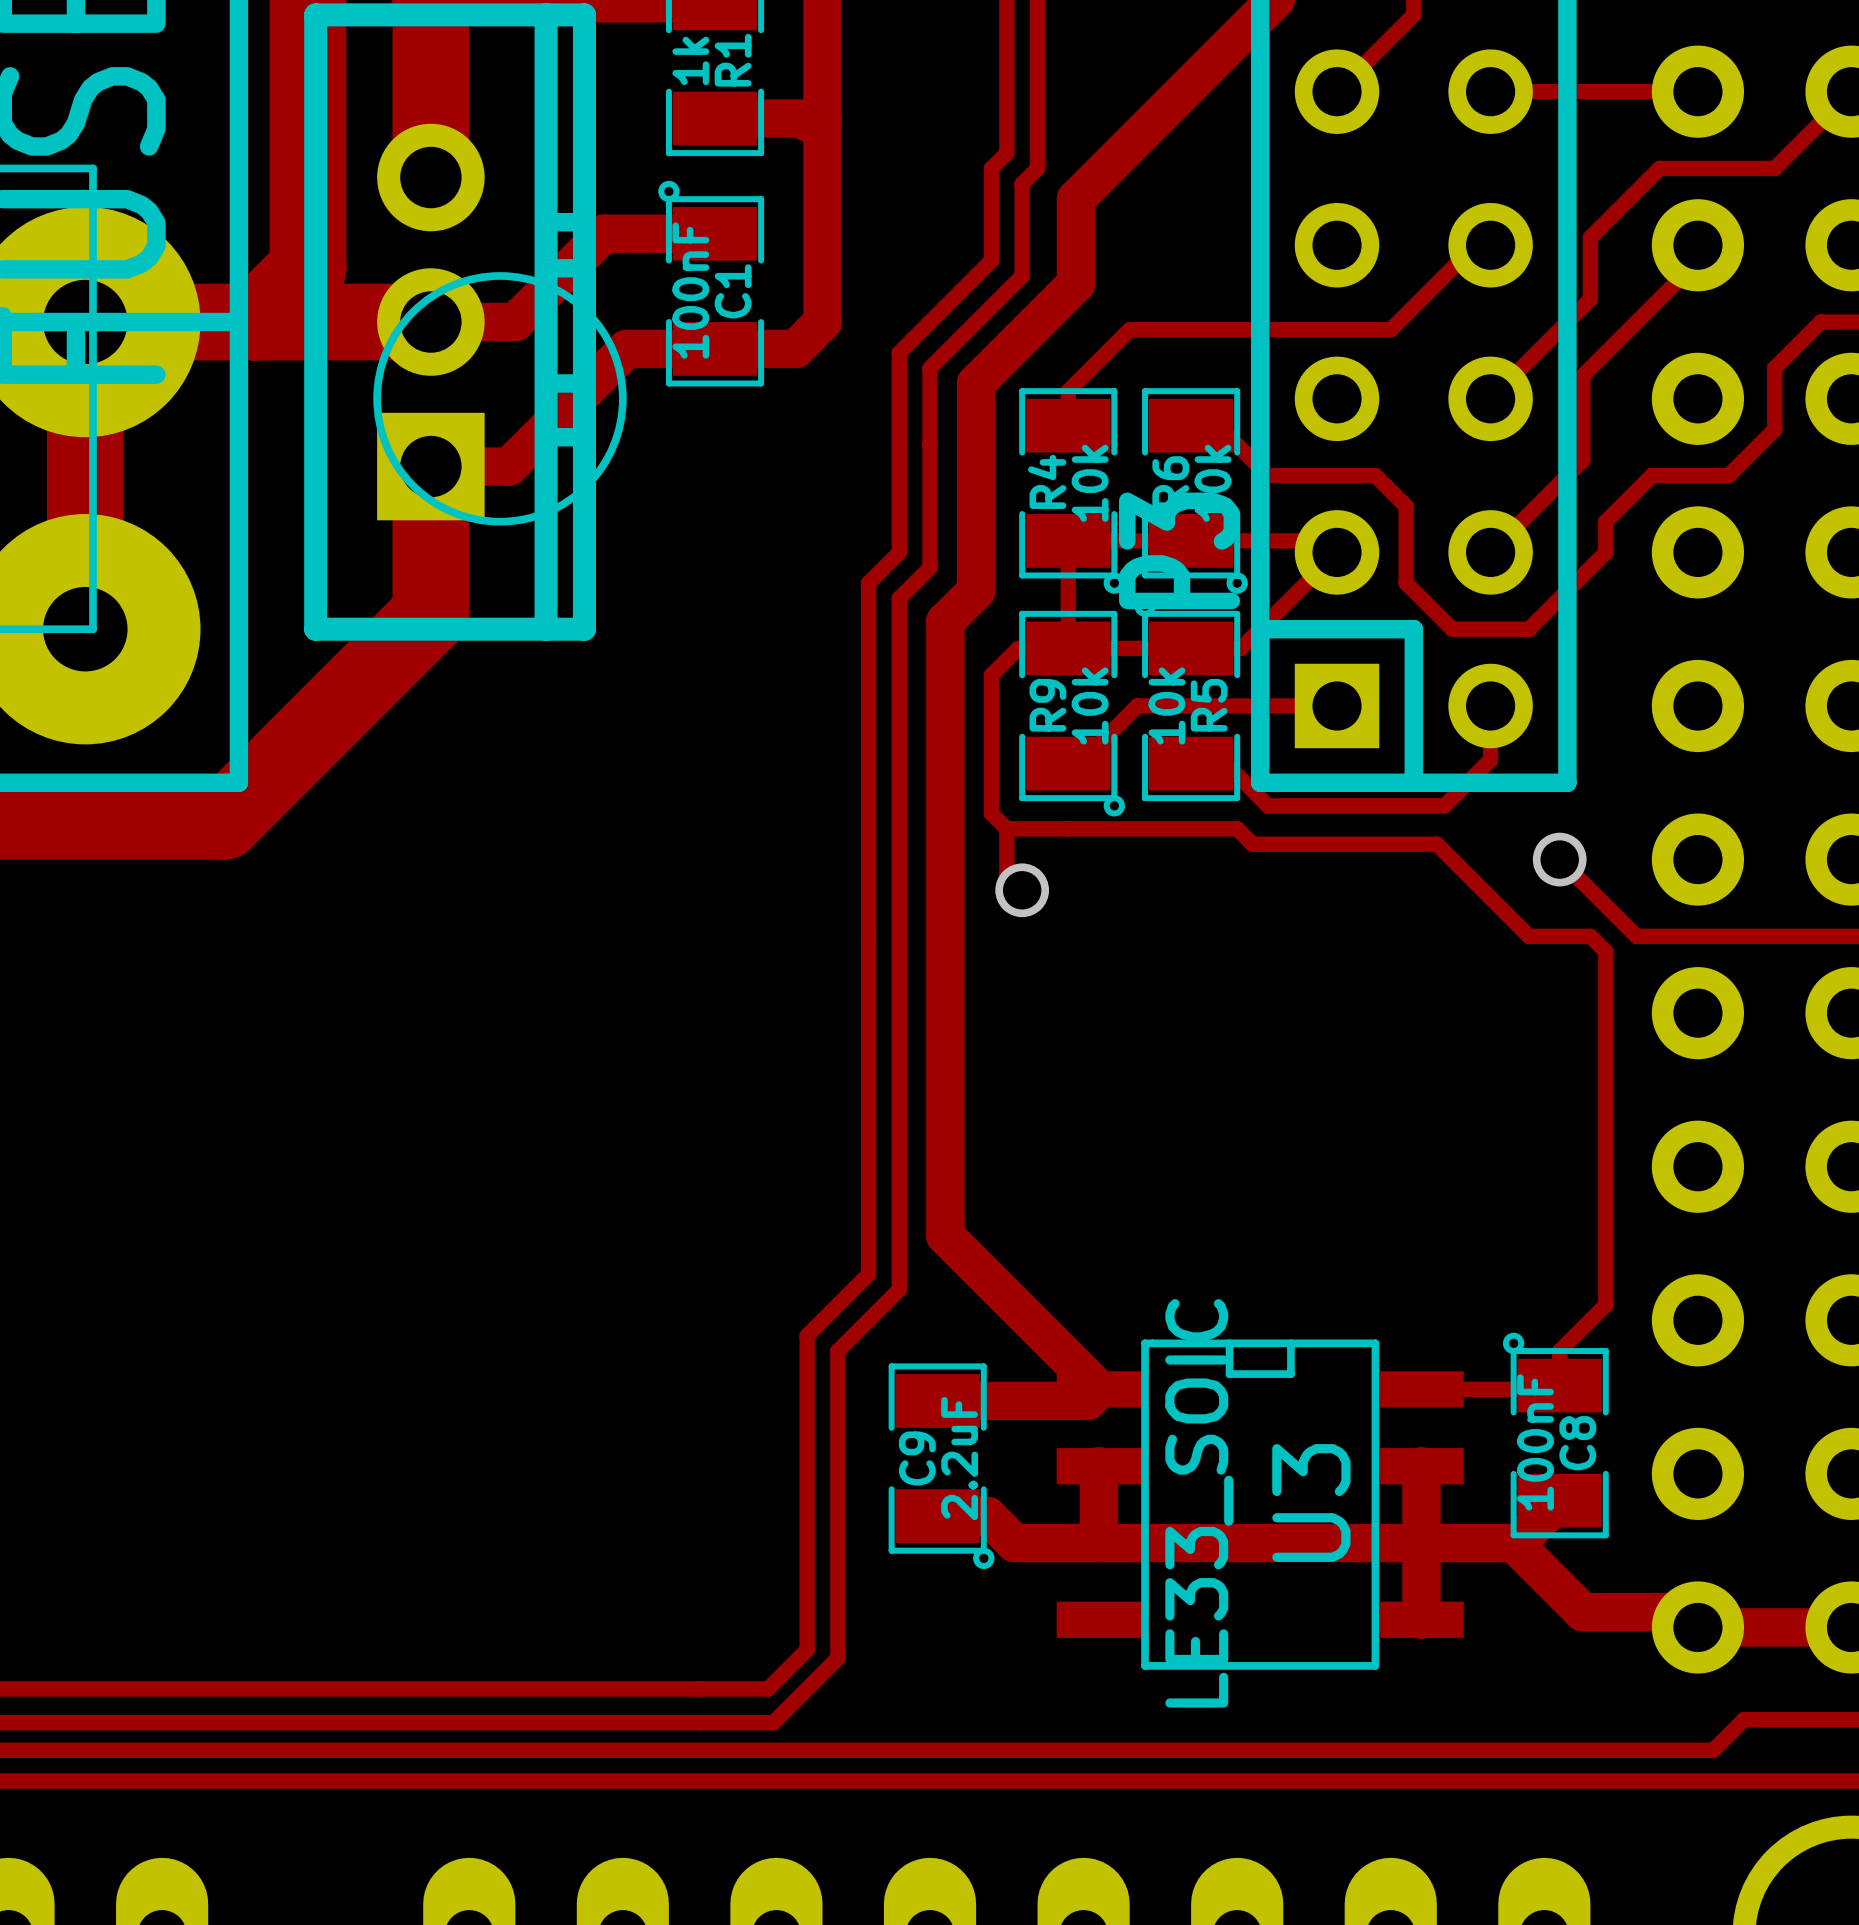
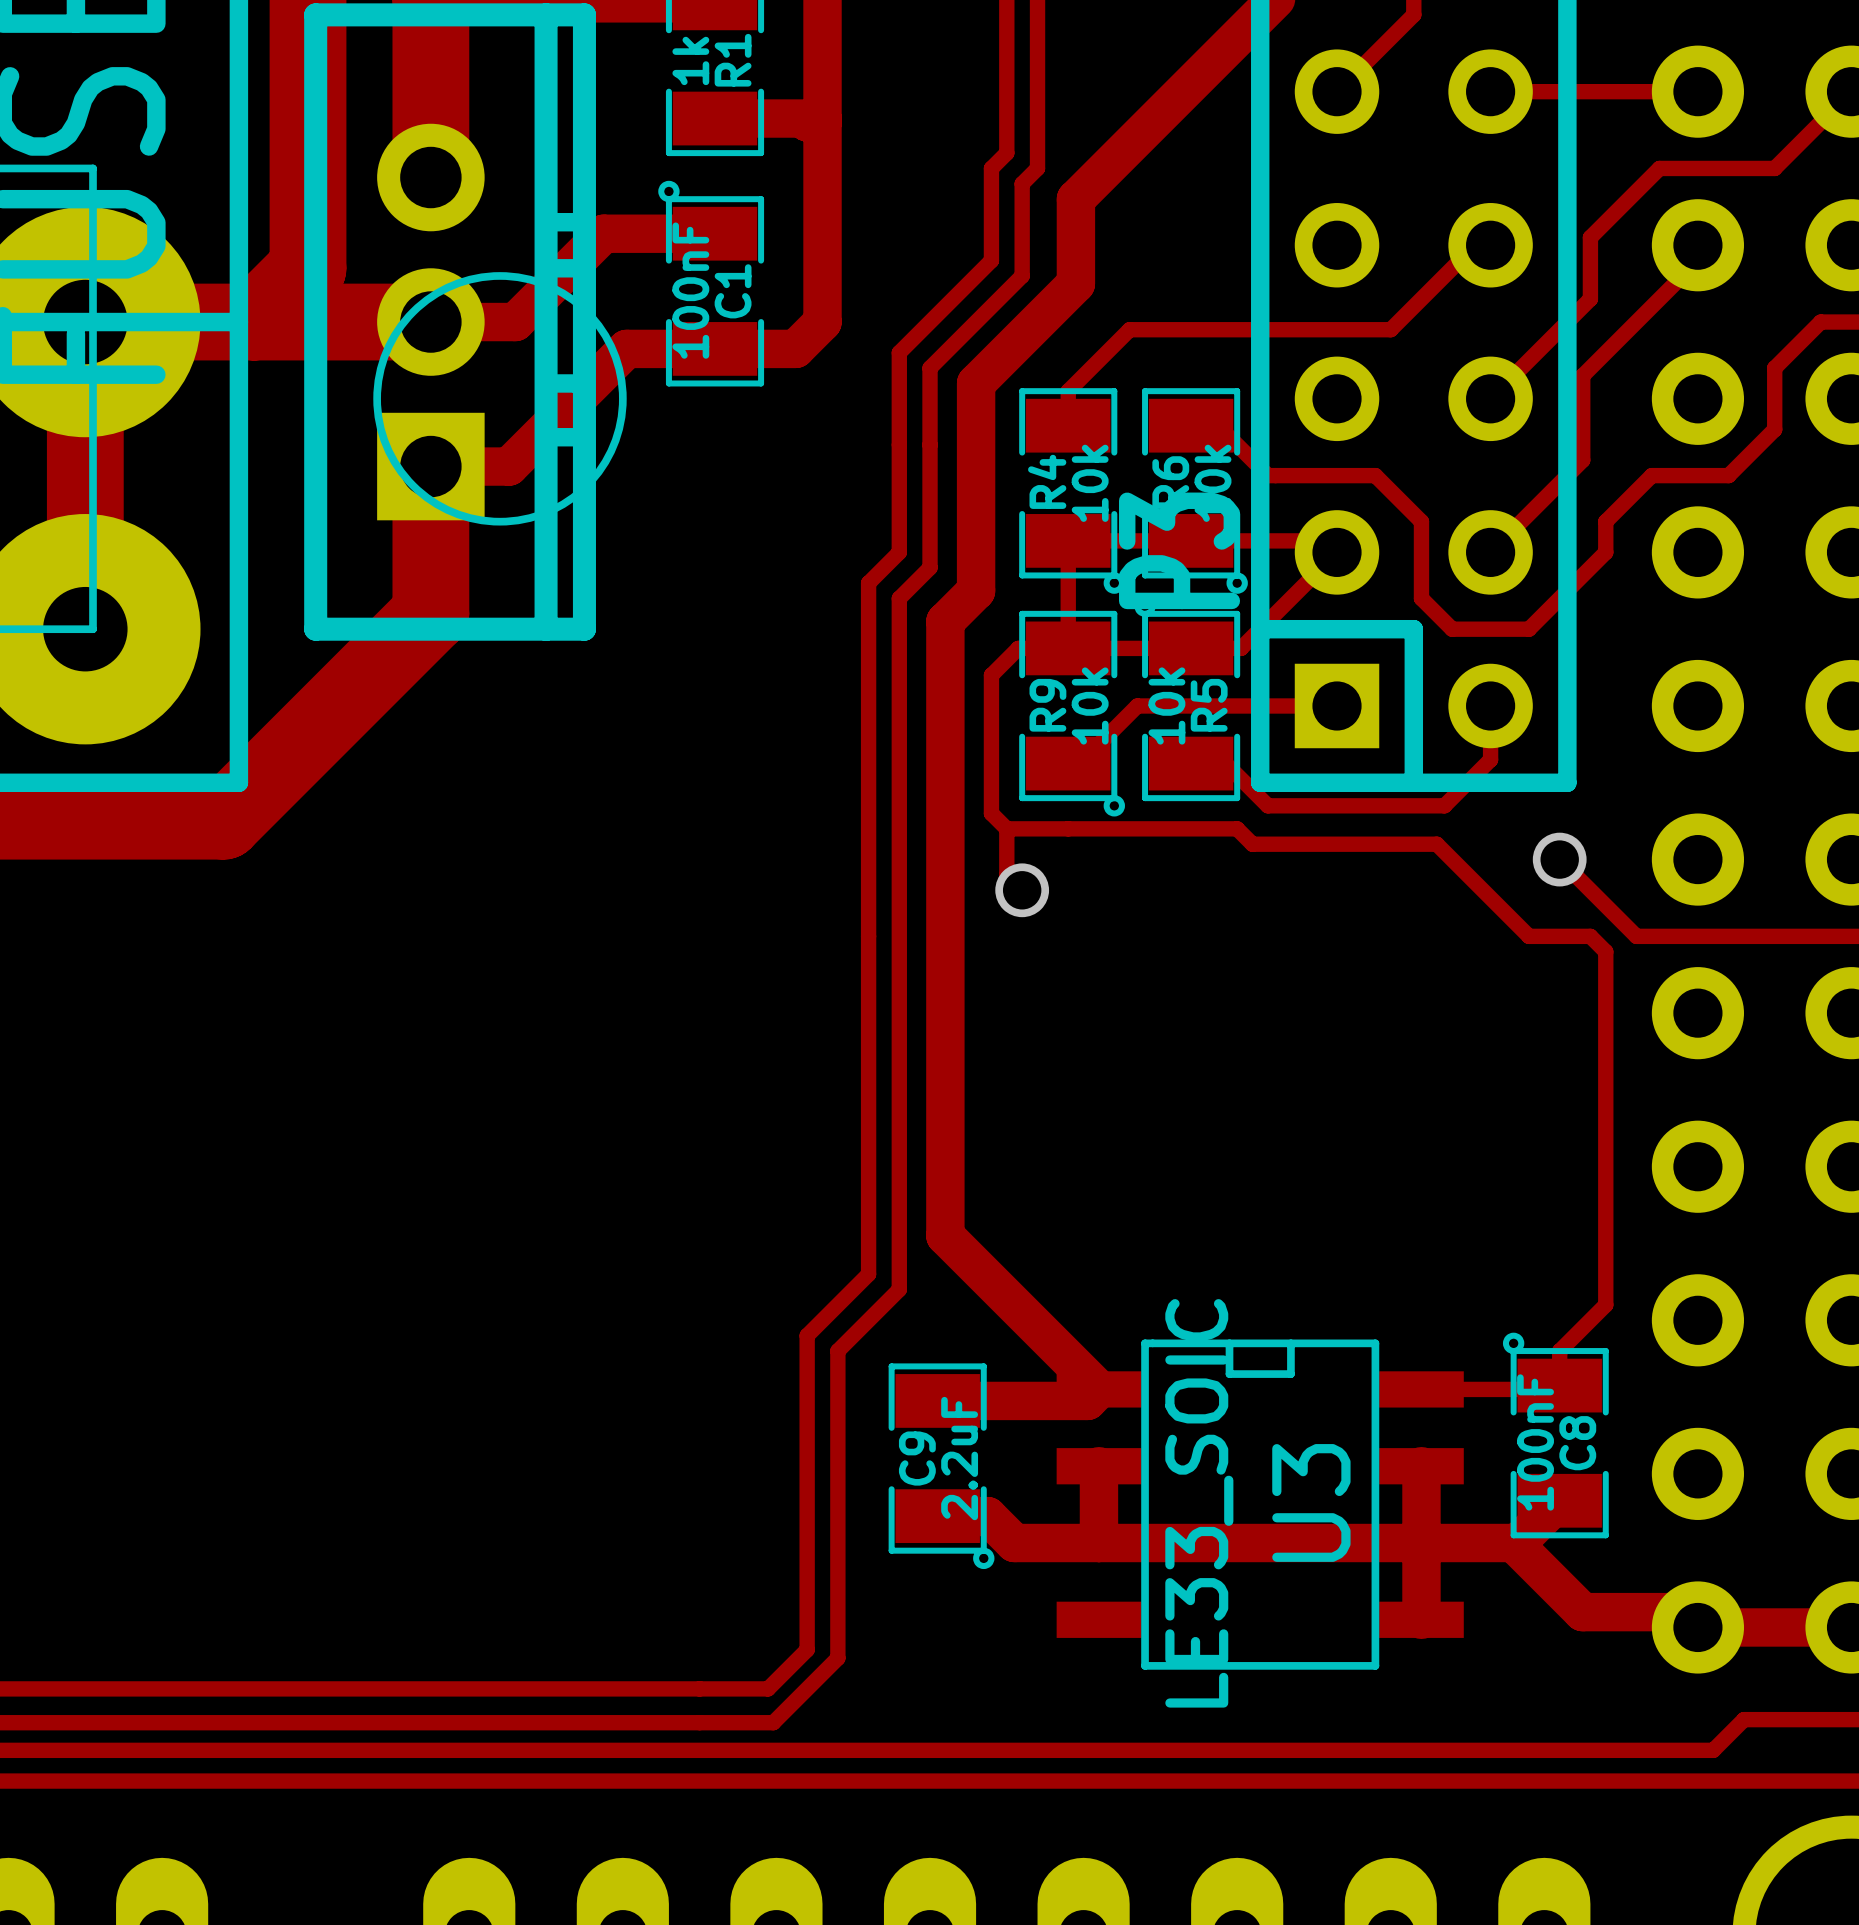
track: (1406, 506) (1406, 583) (1421, 598) -> (1406, 506) (1421, 521) (1421, 598)

